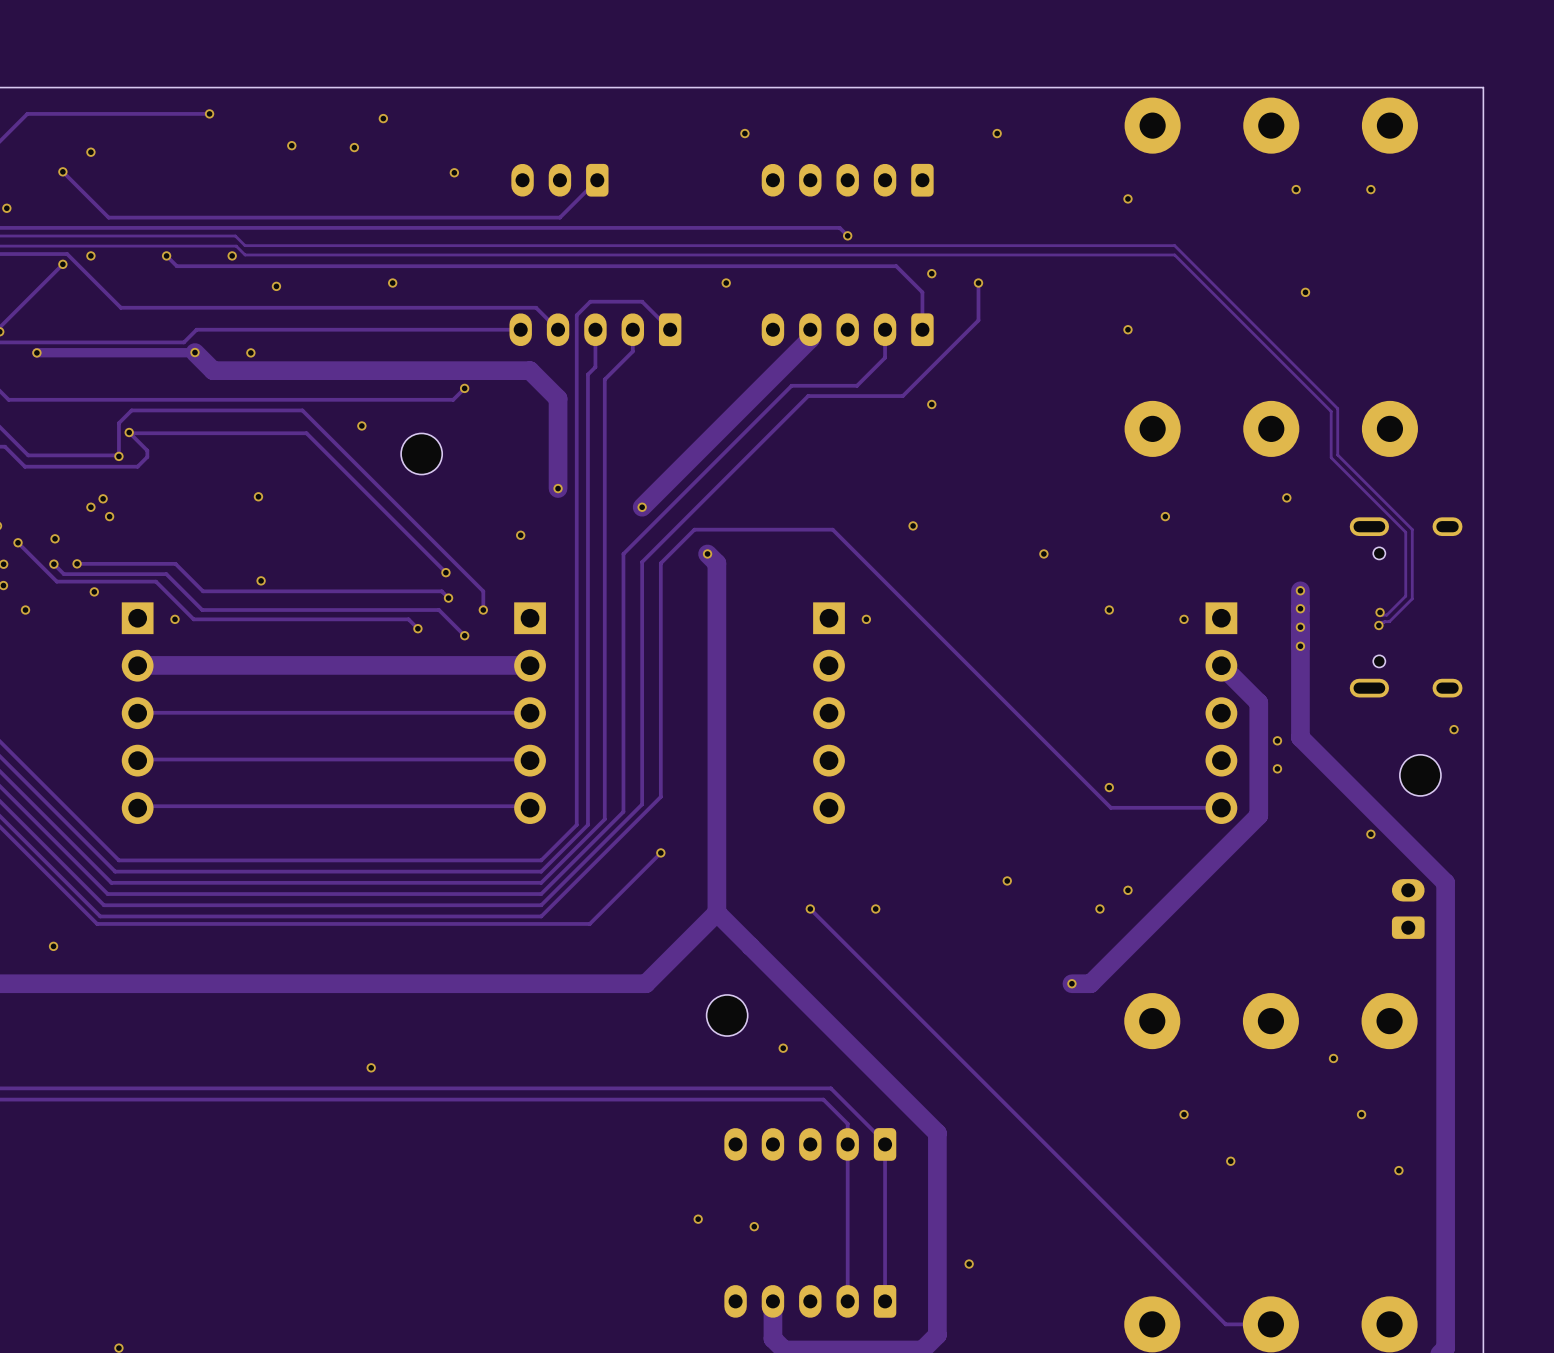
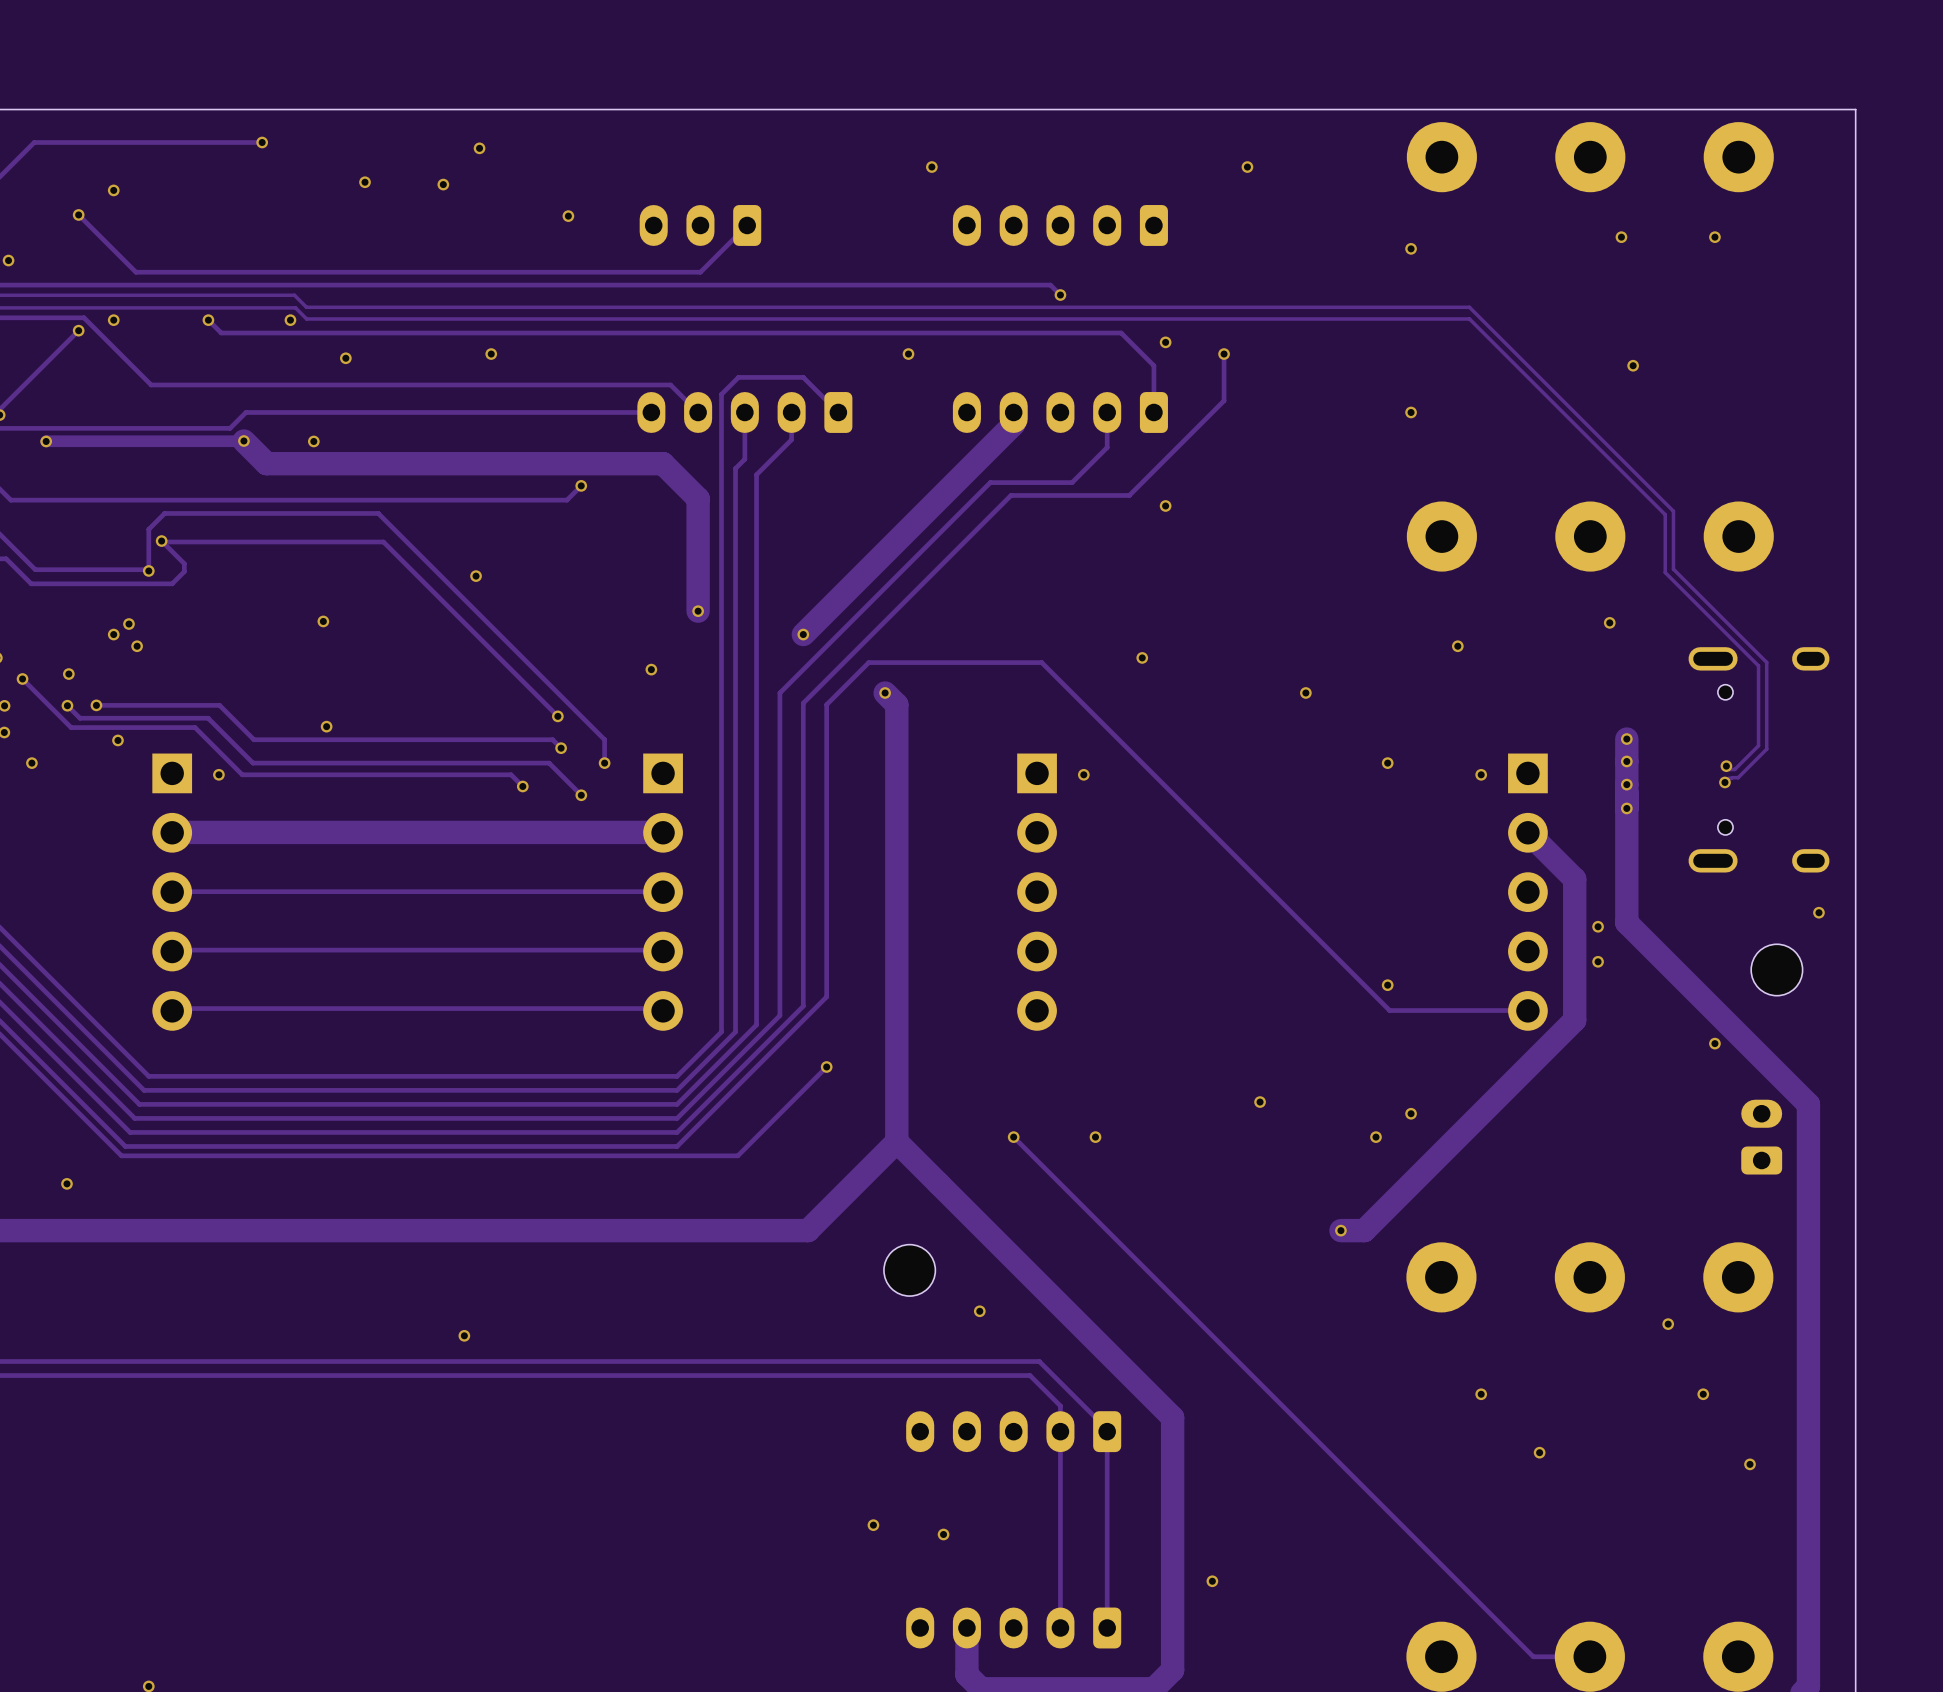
via position: (361, 425) -> (476, 576)
part: (421, 453) -> none

